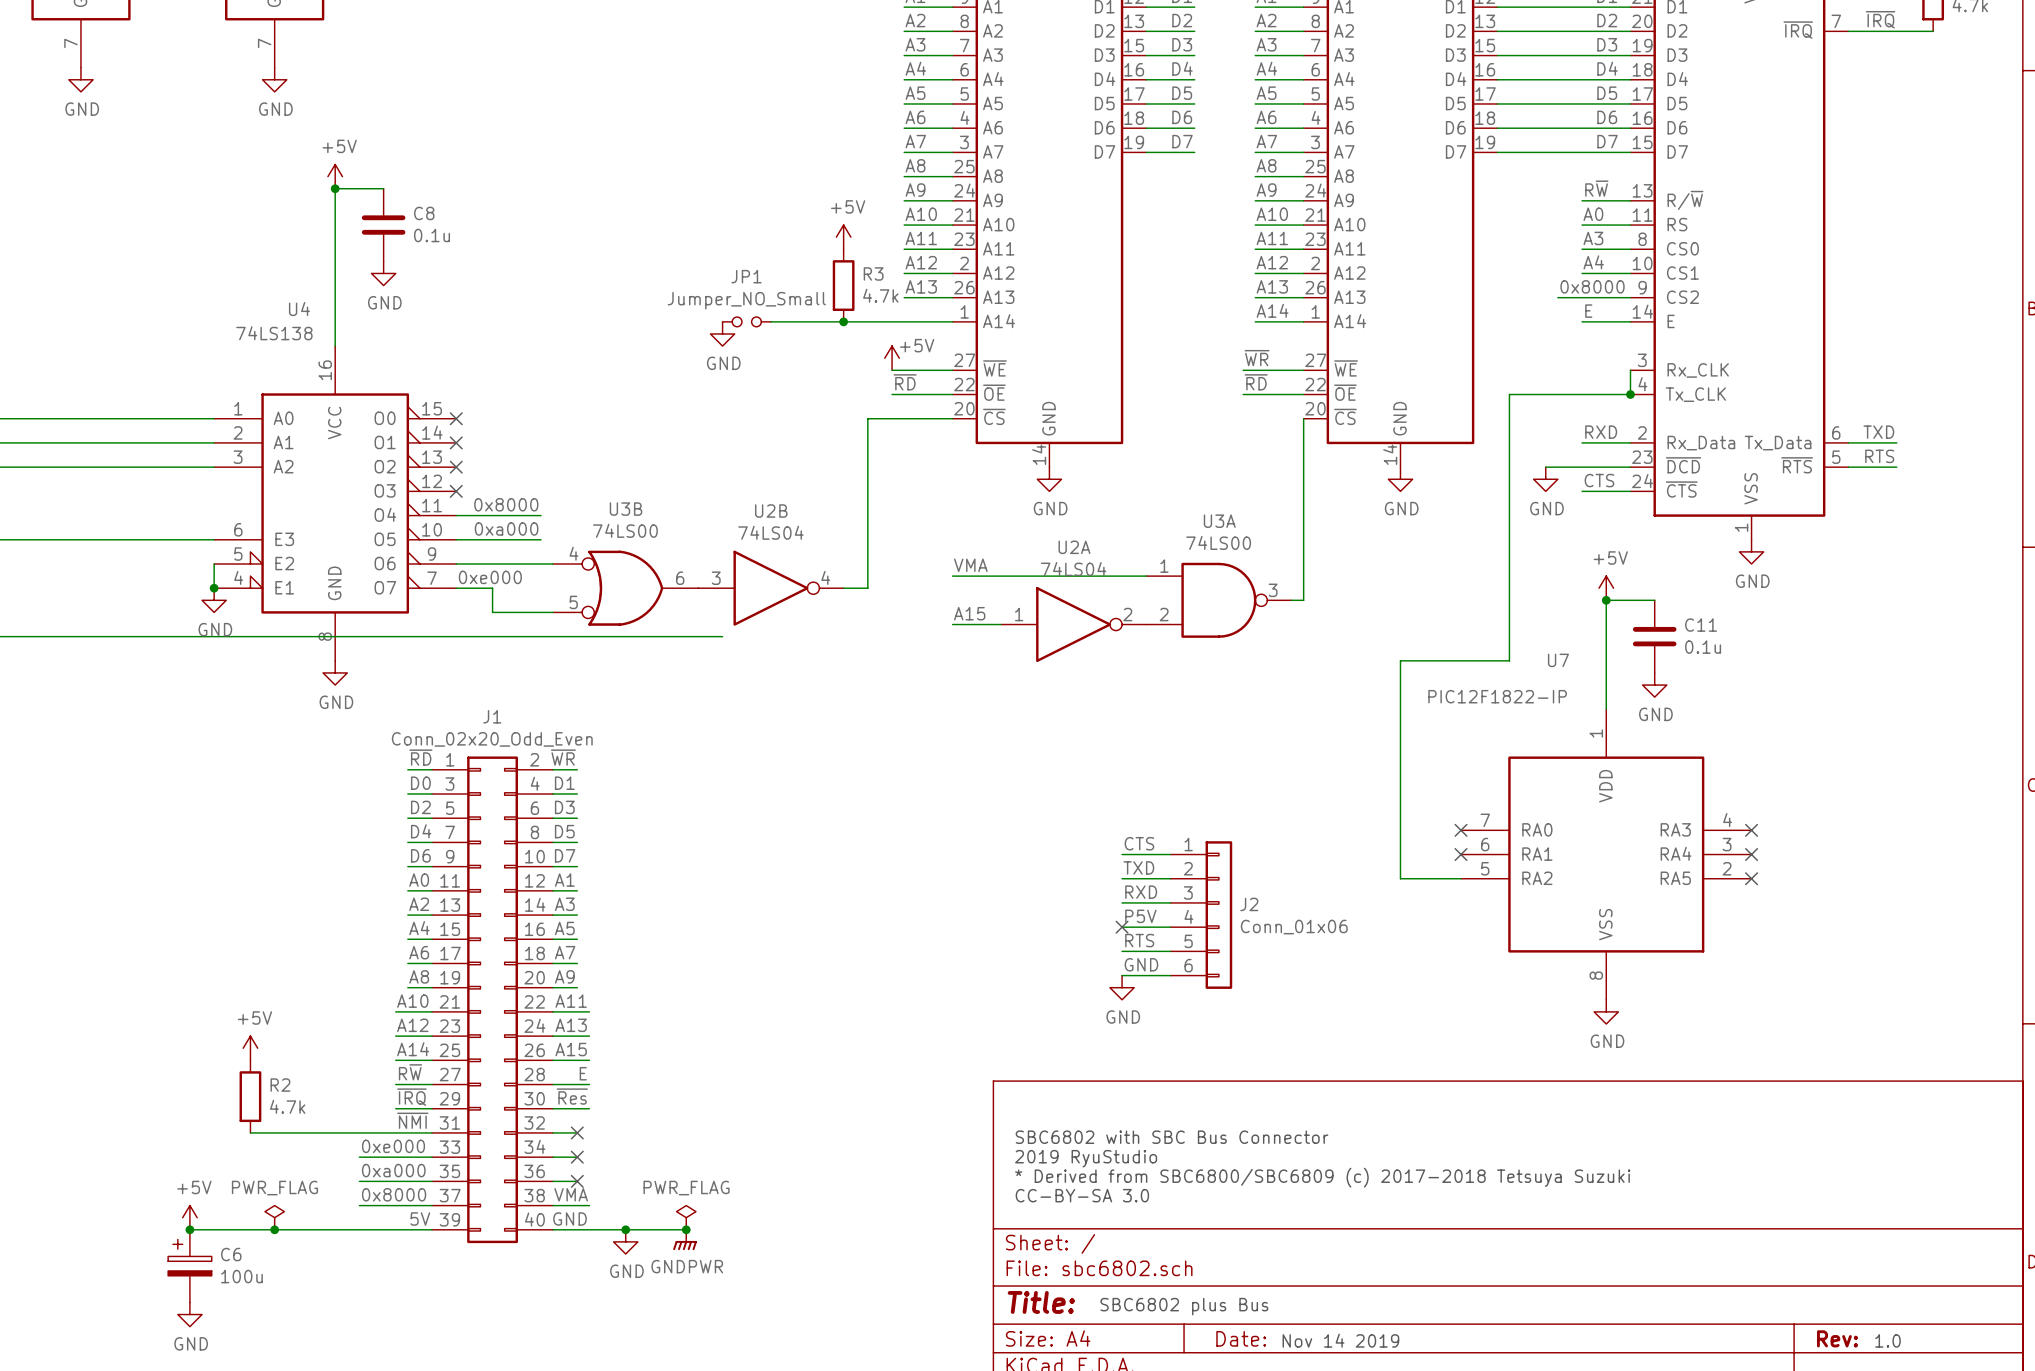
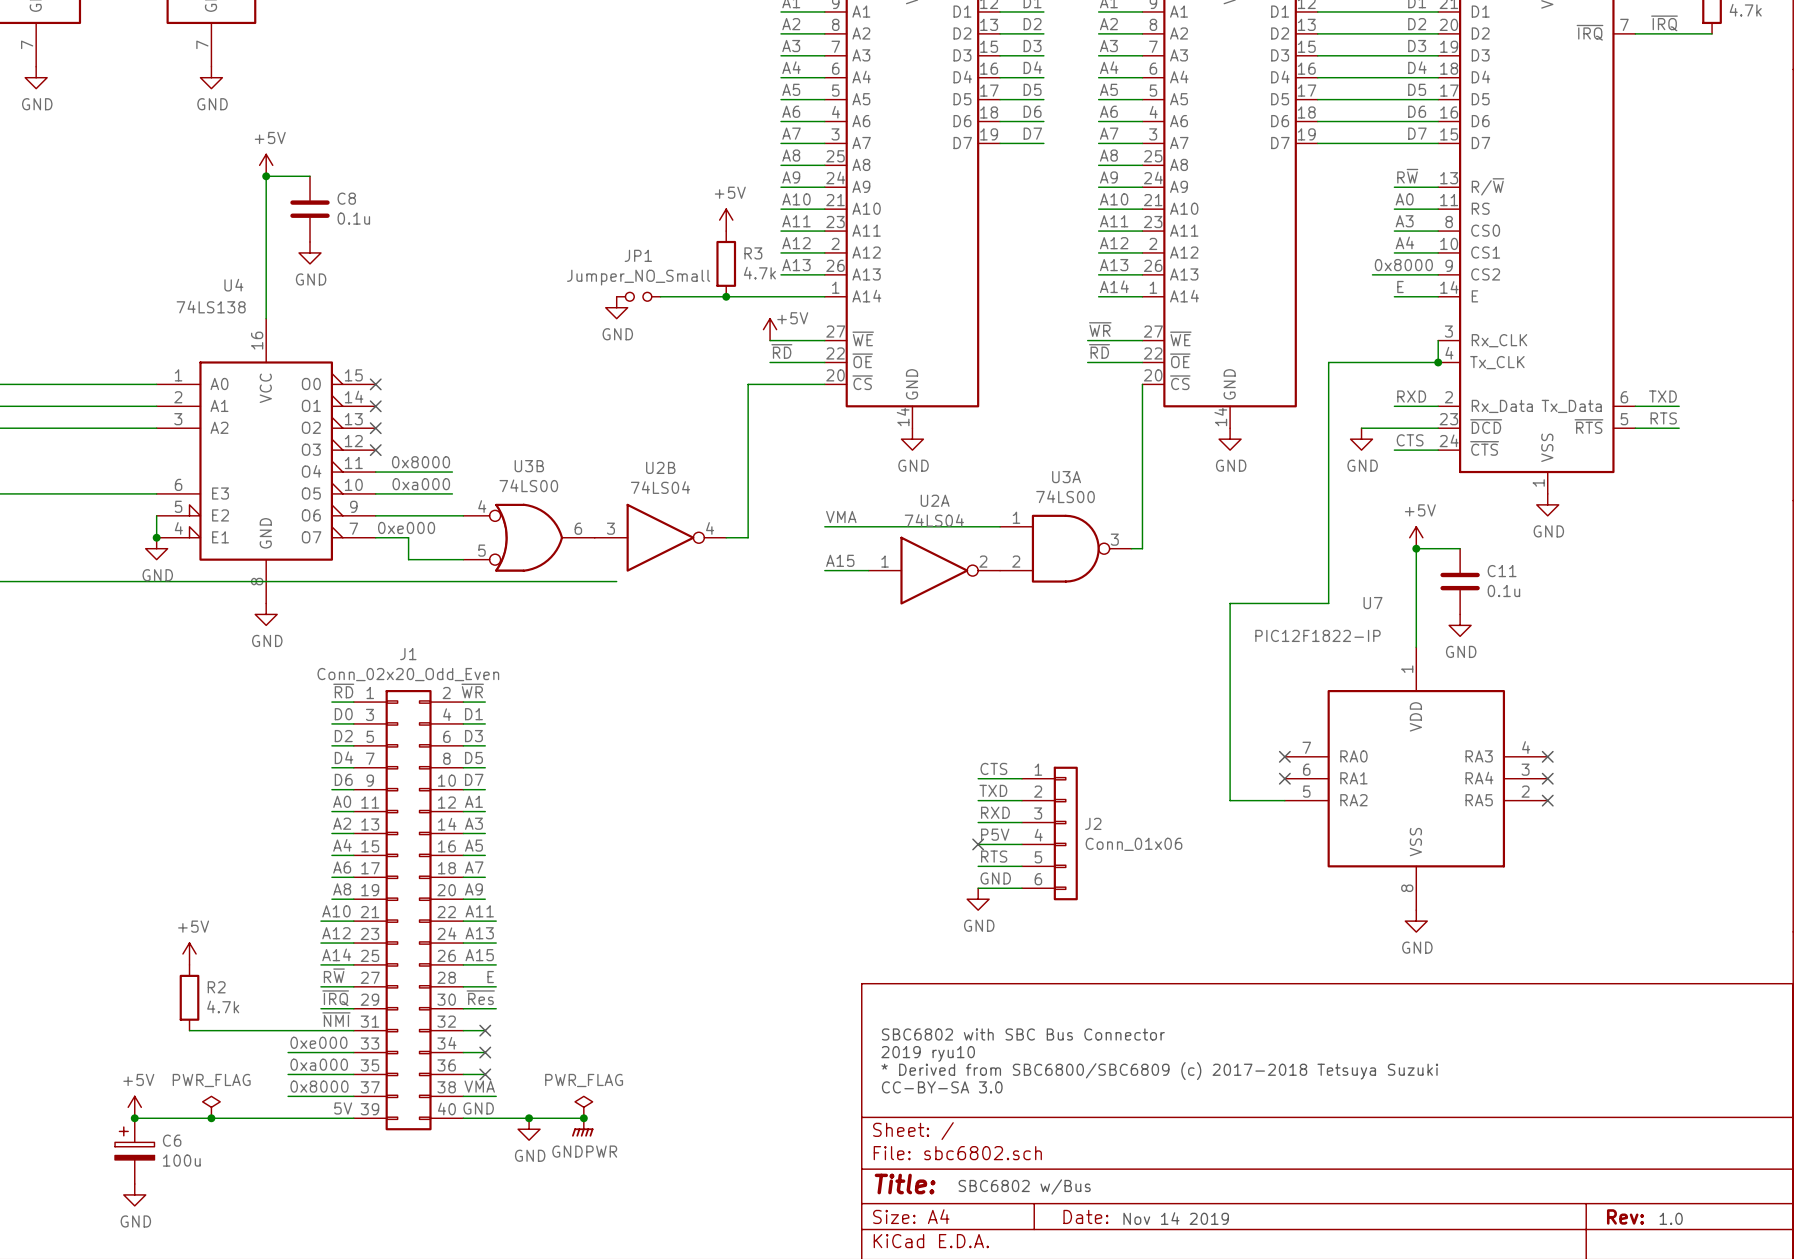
text: 2019 RyuStudio (1086, 1158) -> 2019 ryu10 (928, 1053)
text: SBC6802 plus Bus (1184, 1306) -> SBC6802 w/Bus (1024, 1187)

